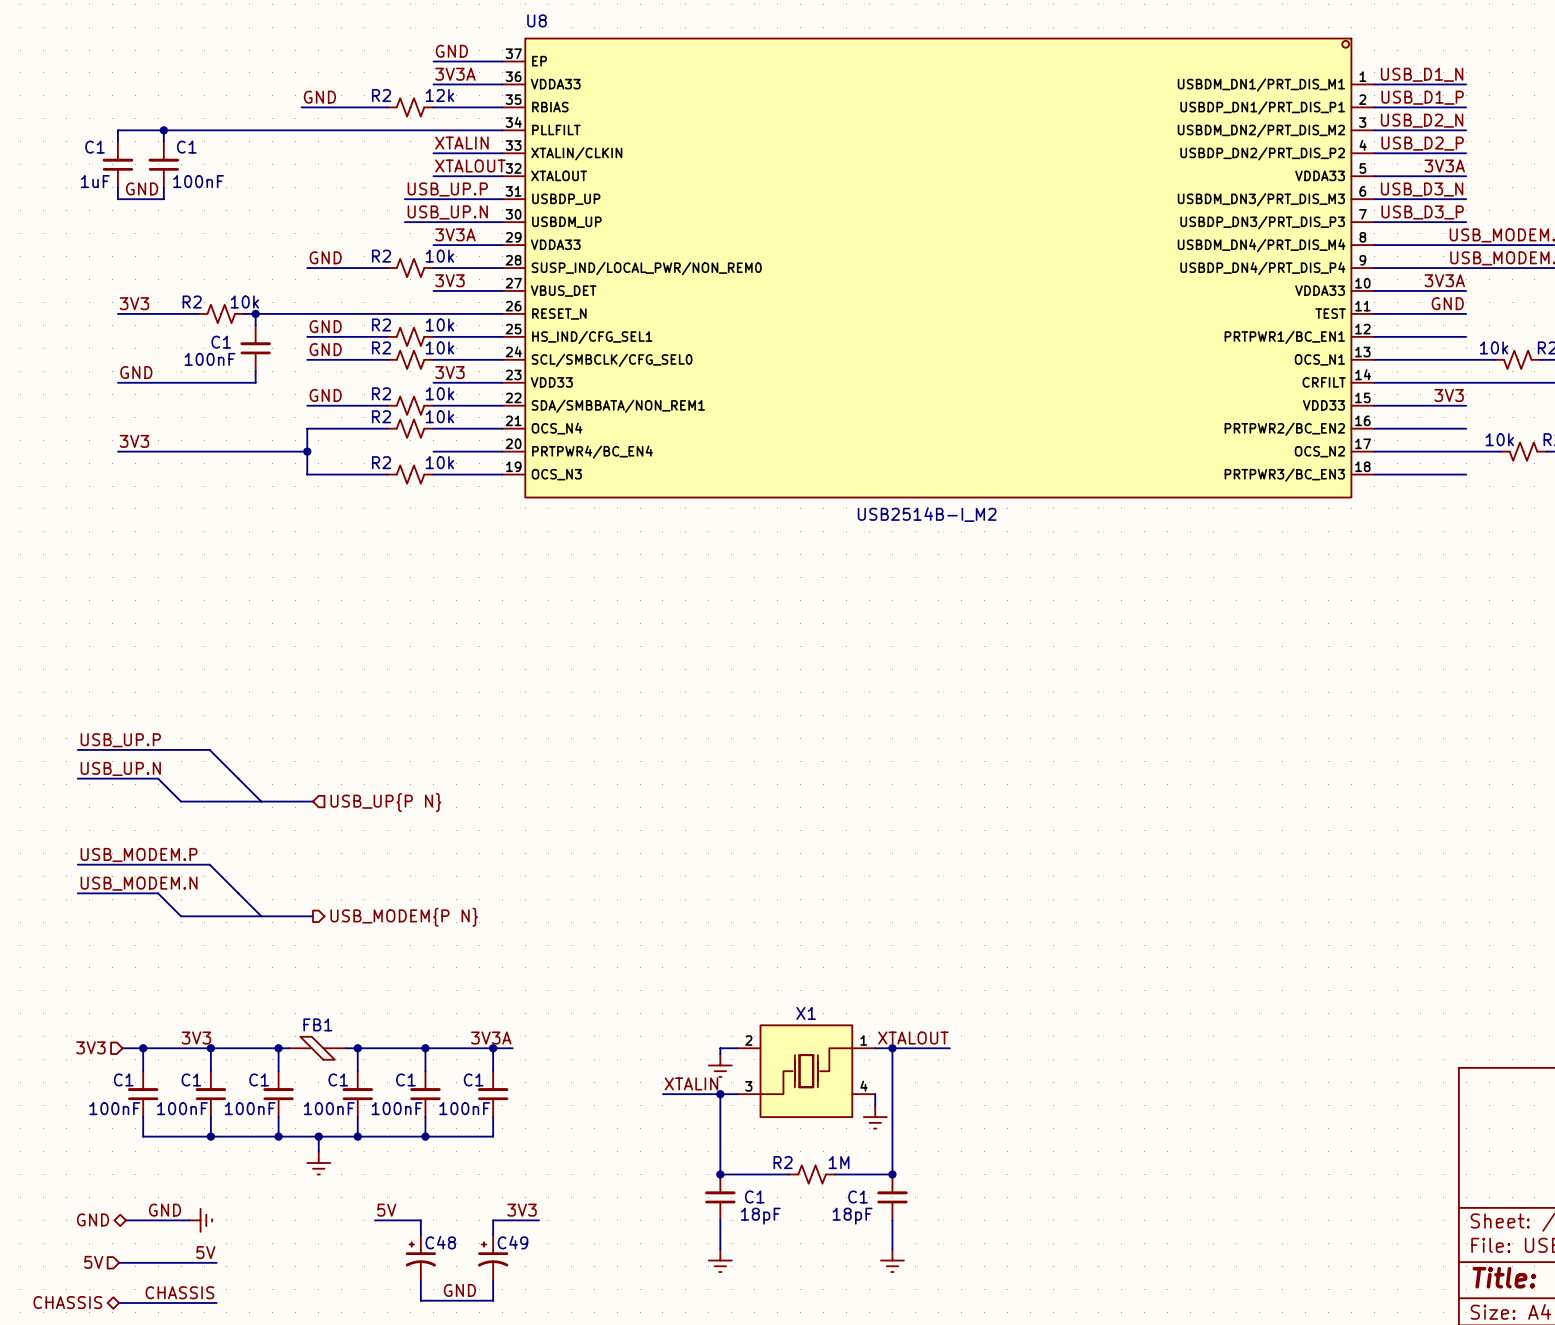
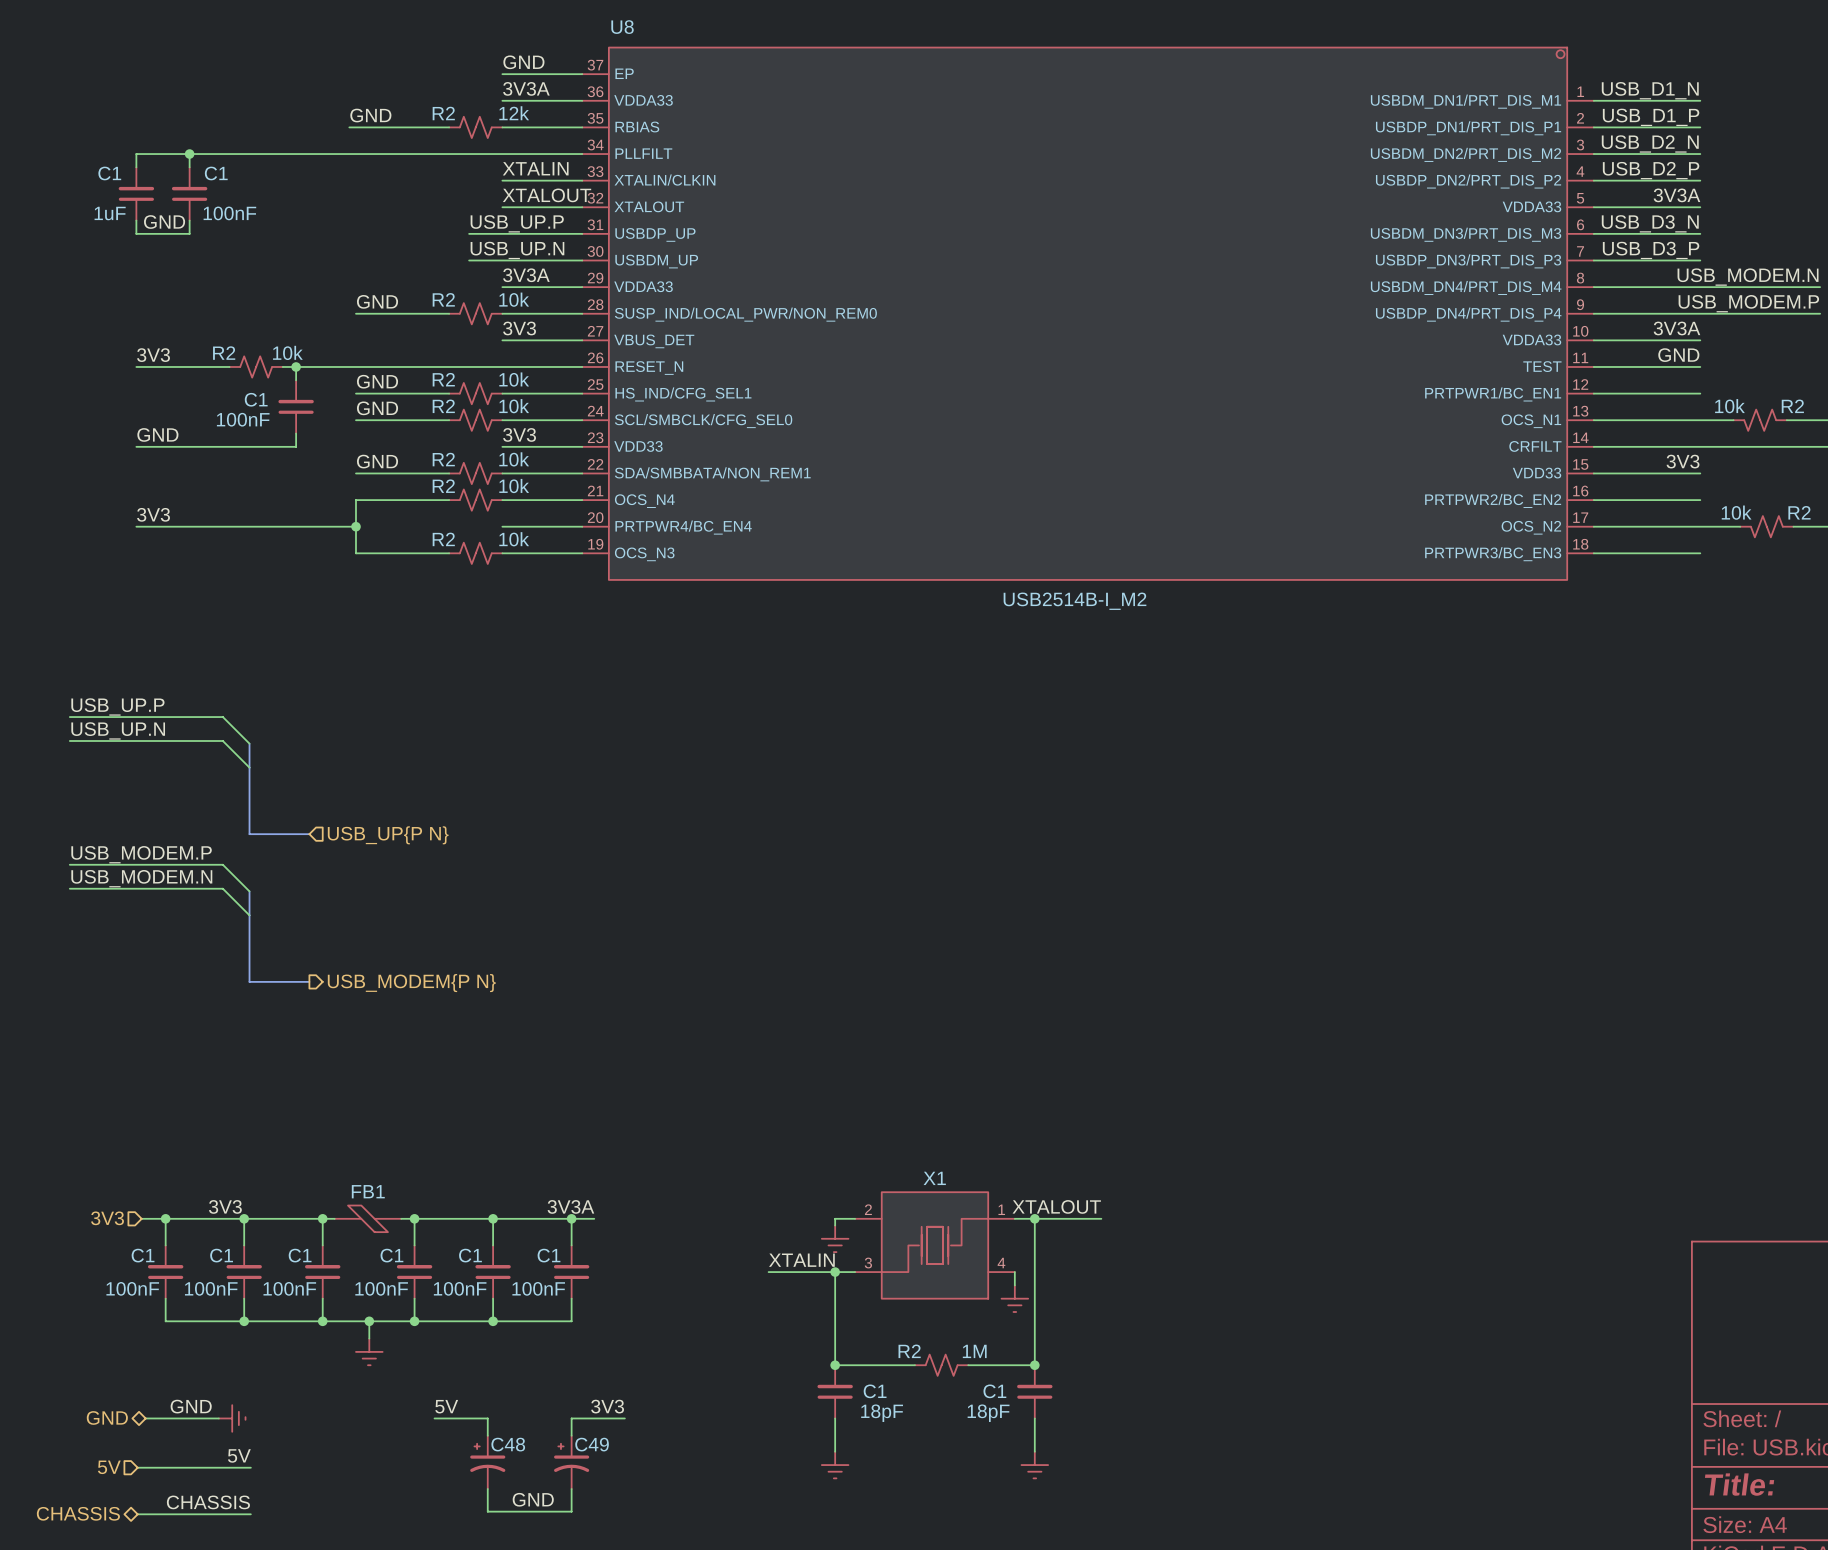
wire: none -> (69, 717) (222, 717) (249, 743)
wire: none -> (69, 740) (222, 740) (249, 767)
bus: none -> (249, 743) (249, 834) (309, 834)
label position: USB_UP.P (120, 740) -> USB_UP.P (117, 706)
wire: none -> (69, 864) (222, 864) (249, 891)
wire: (77, 749) (209, 749) (261, 801) -> none
wire: none -> (69, 888) (222, 888) (249, 915)
bus: none -> (249, 891) (249, 981) (309, 981)
label position: USB_UP.N (120, 768) -> USB_UP.N (118, 730)
wire: (77, 778) (158, 778) (181, 801) -> none
bus: (181, 801) (313, 801) -> none
hierarchical label position: USB_UP{P N} (385, 802) -> USB_UP{P N} (388, 835)
label position: USB_MODEM.P (139, 854) -> USB_MODEM.P (141, 854)
wire: (77, 864) (209, 864) (261, 916) -> none
label position: USB_MODEM.N (139, 883) -> USB_MODEM.N (141, 878)
wire: (77, 893) (158, 893) (181, 916) -> none
bus: (181, 916) (313, 916) -> none
hierarchical label position: USB_MODEM{P N} (404, 917) -> USB_MODEM{P N} (411, 983)

